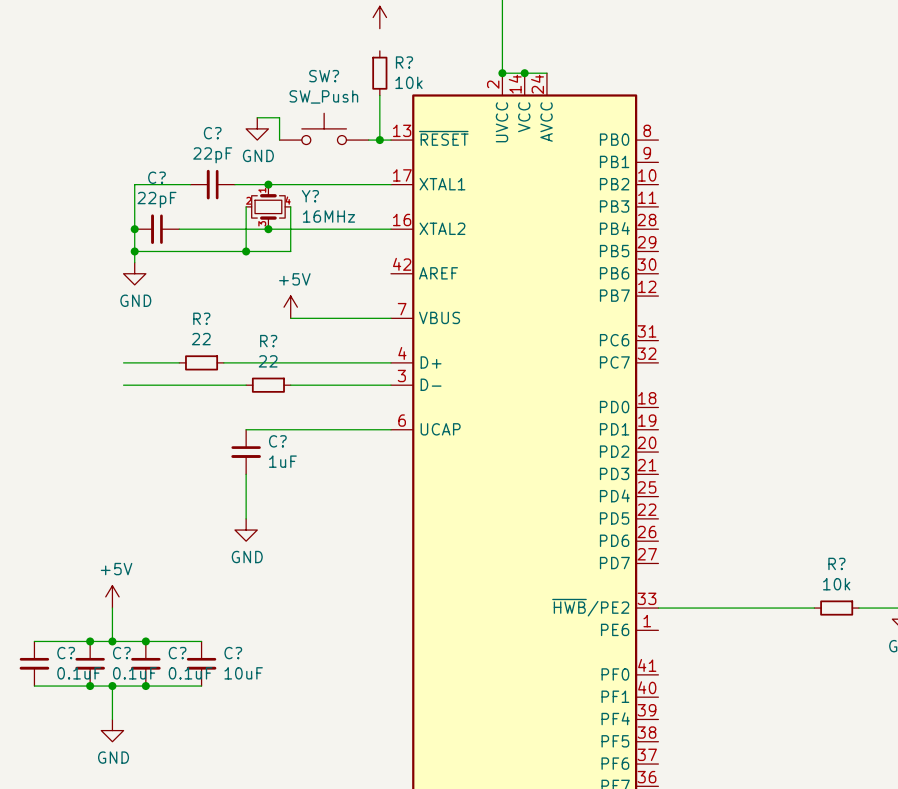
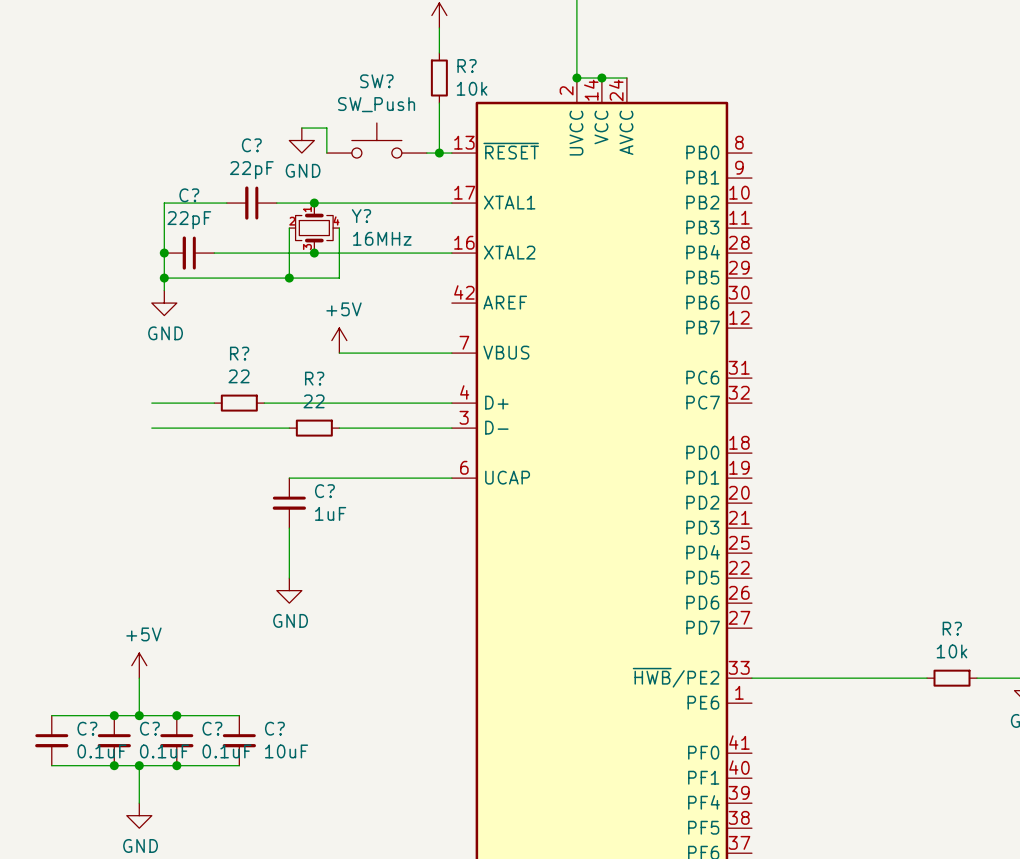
wire: none -> (439, 28) (439, 53)

